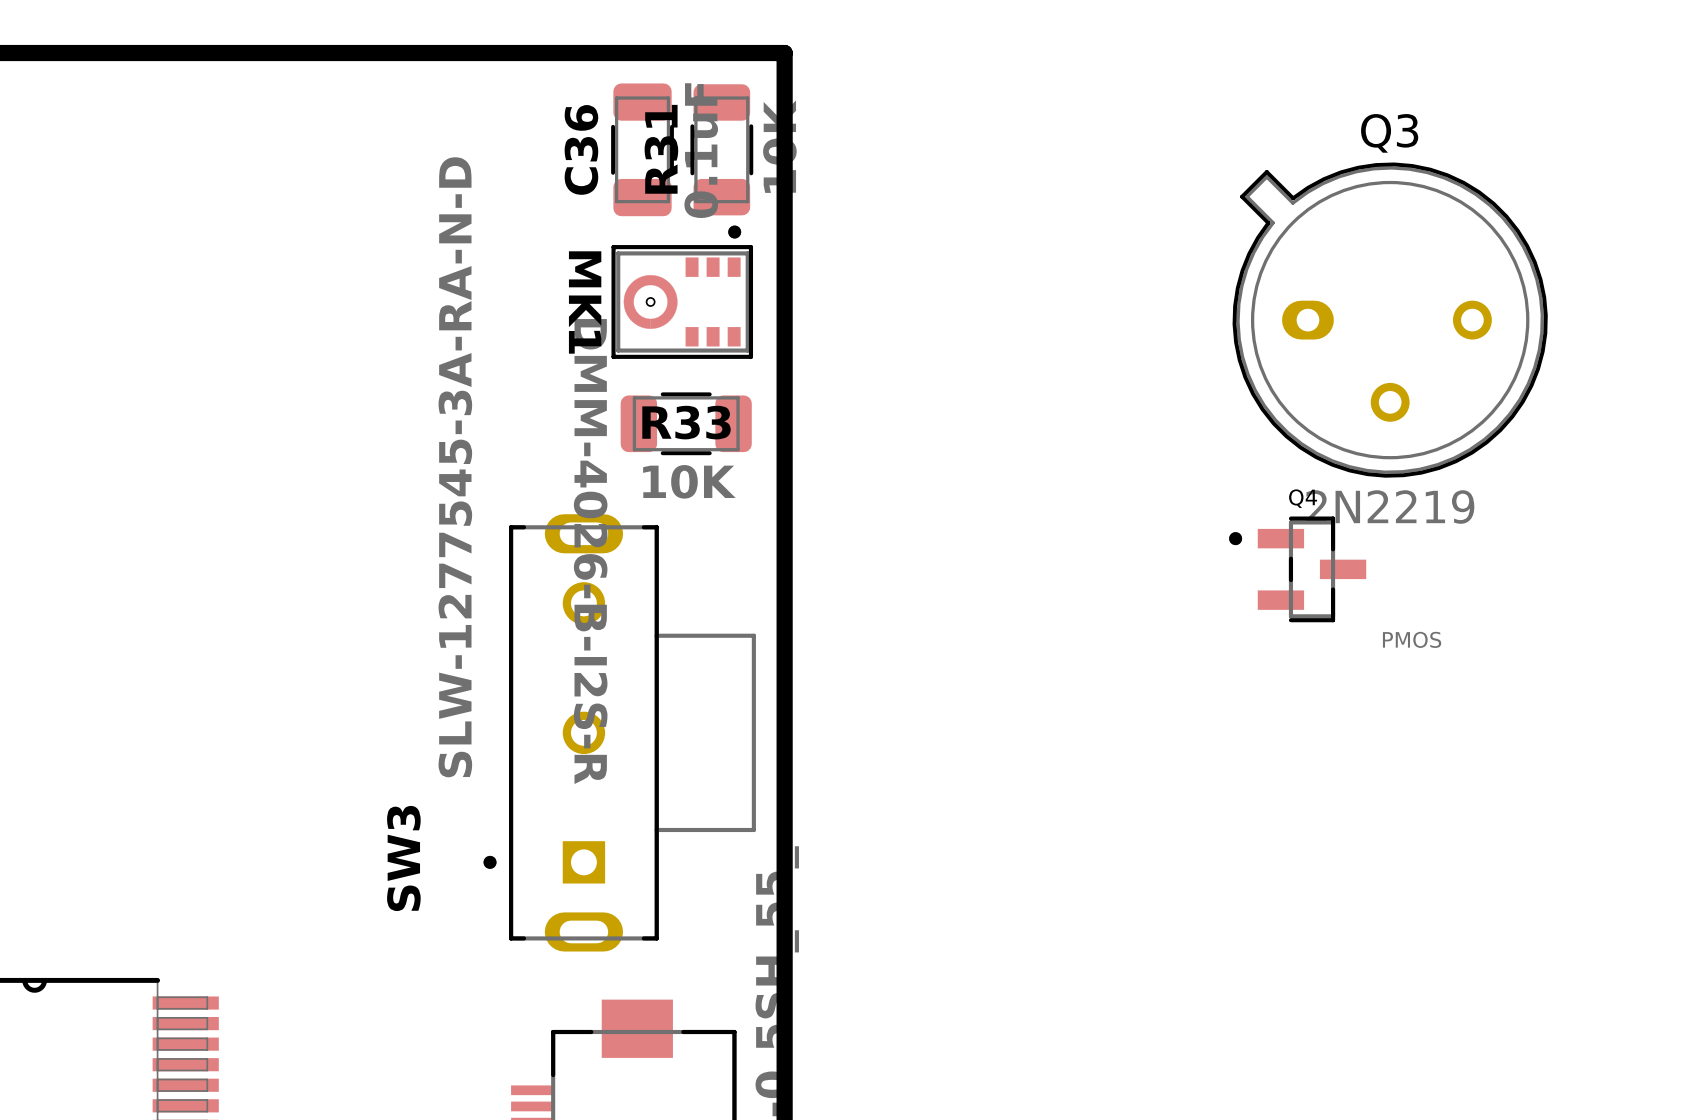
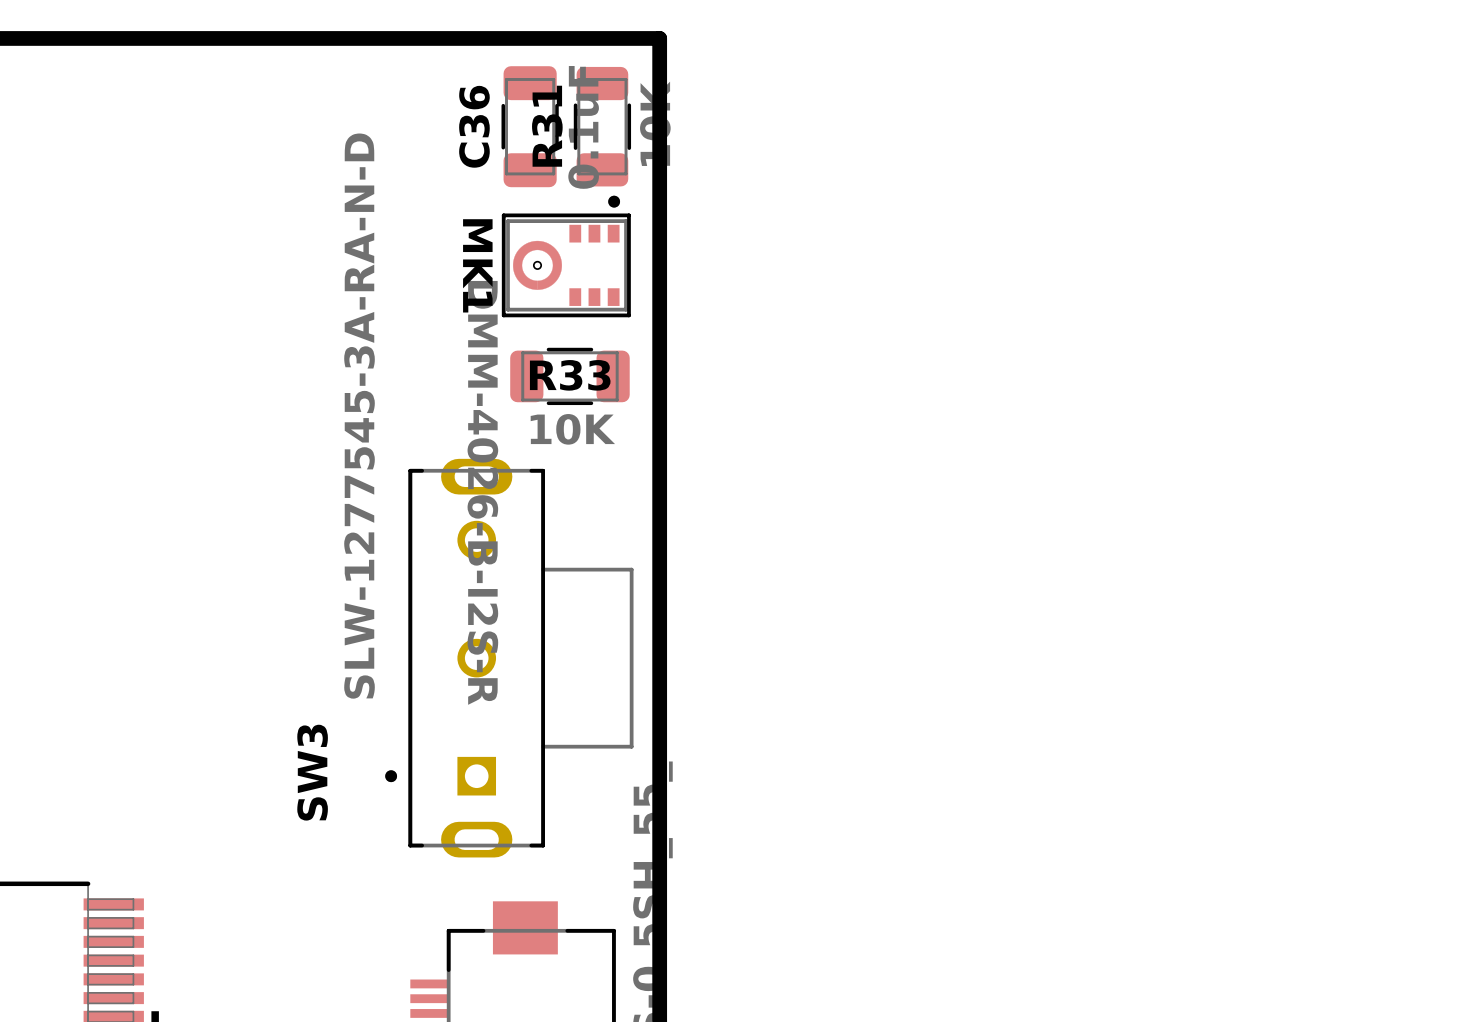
Q3: 2N2219 (1390, 320) -> none
Q4: PMOS (1297, 569) -> none

